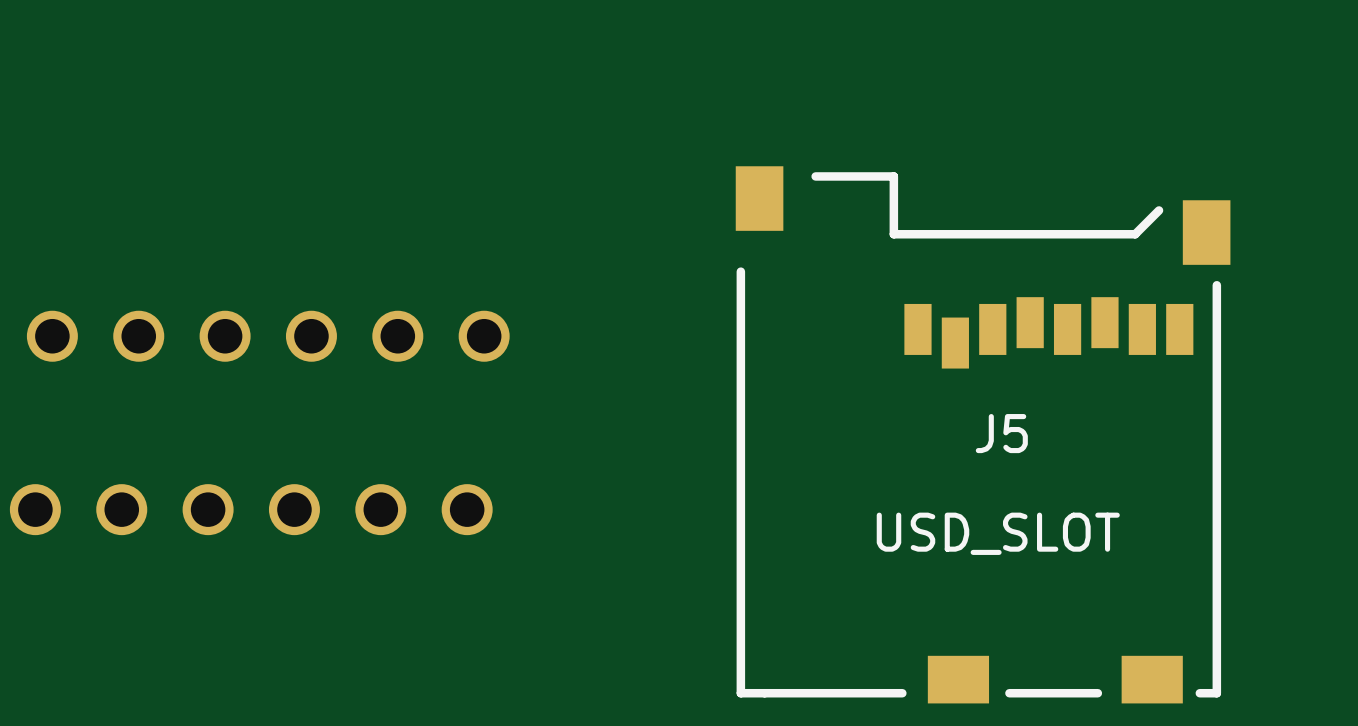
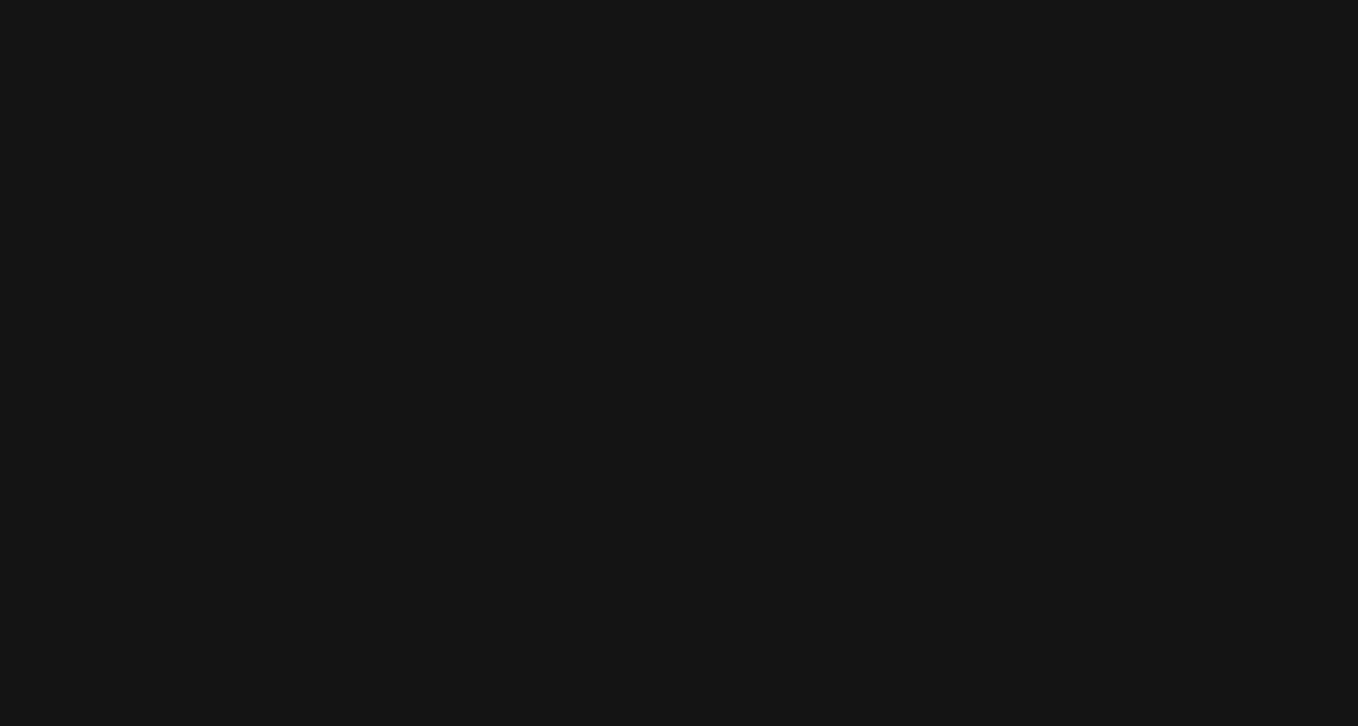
part: (268, 336) -> none
J5: USD_SLOT (983, 434) -> none
part: (251, 509) -> none

